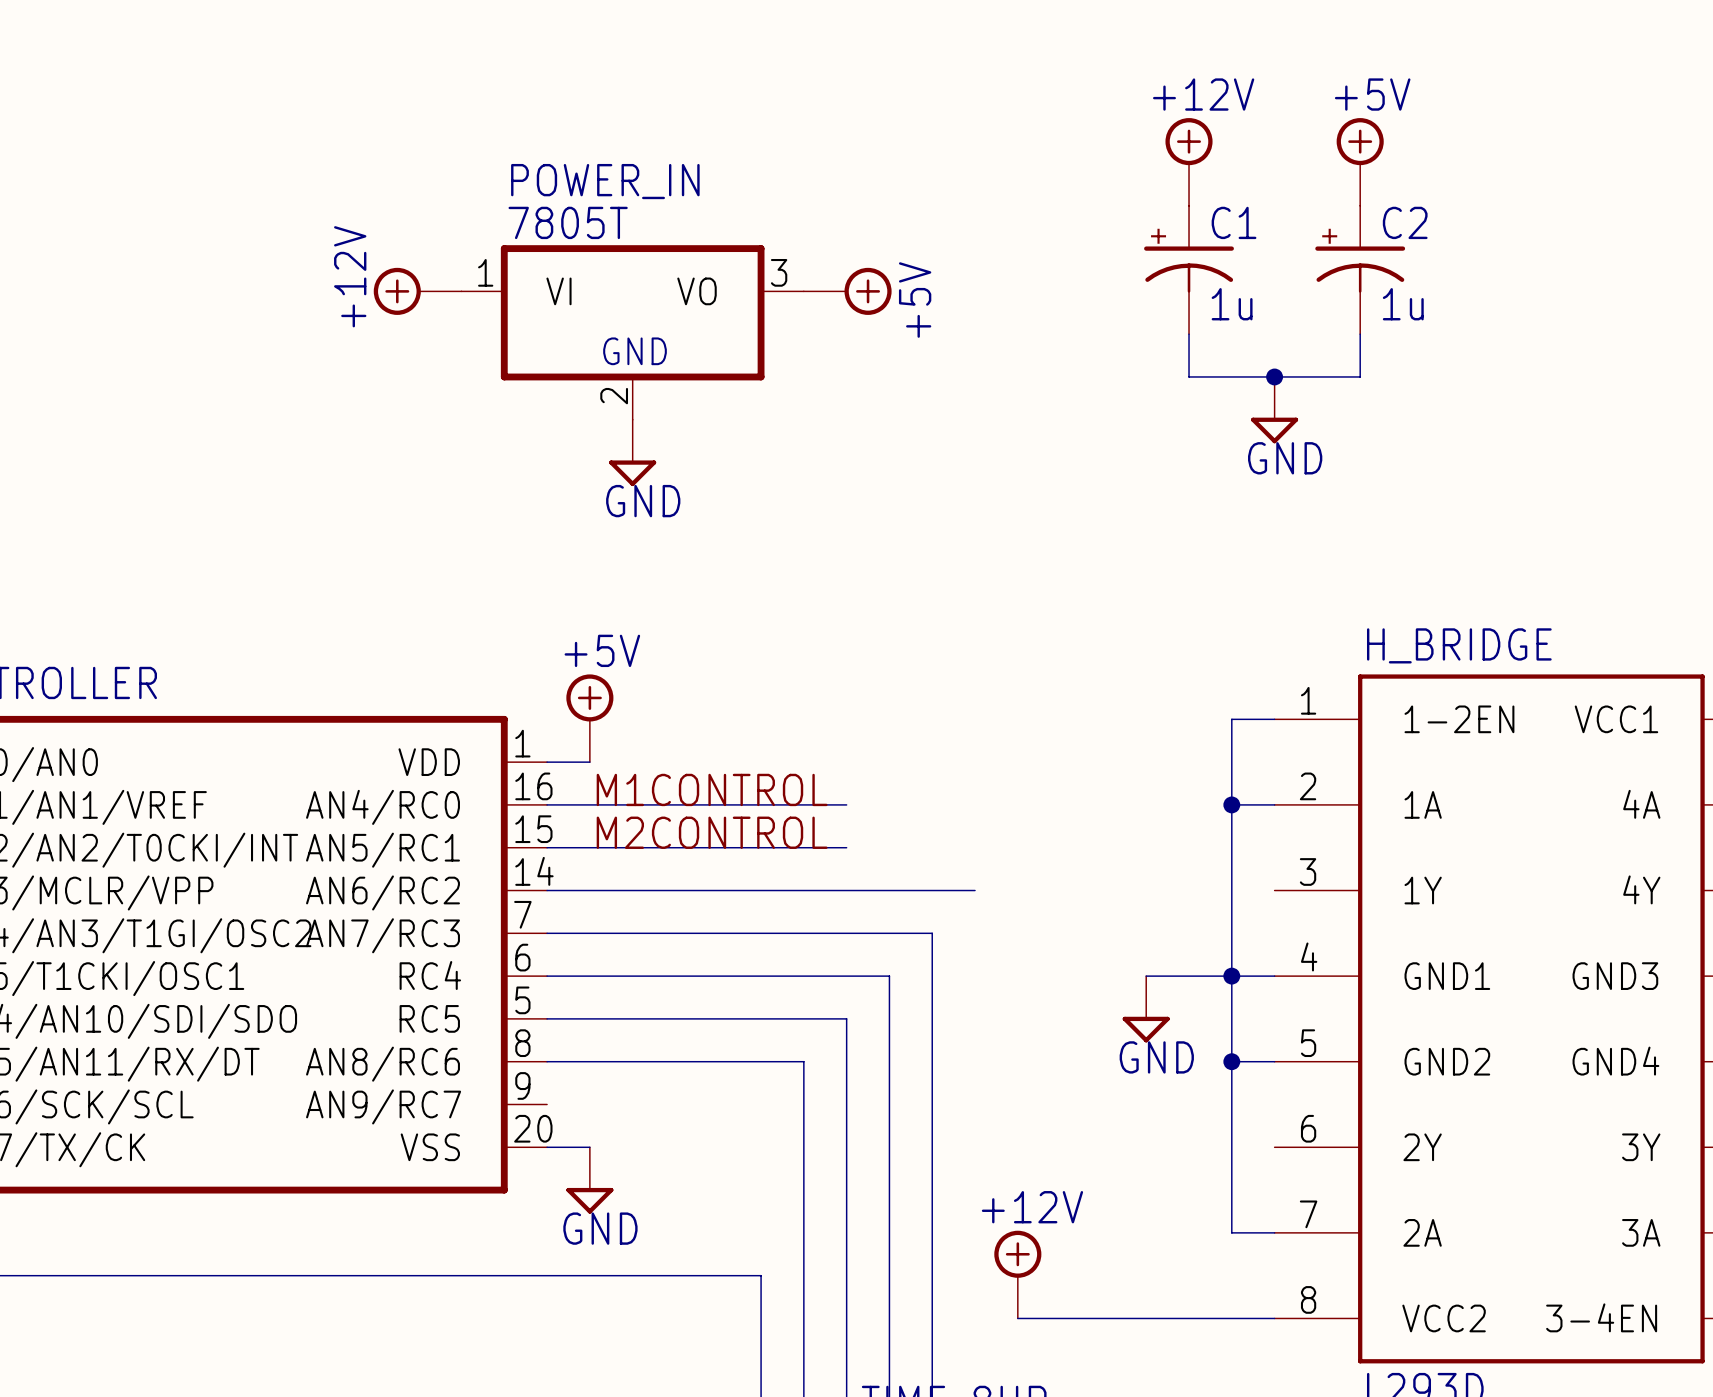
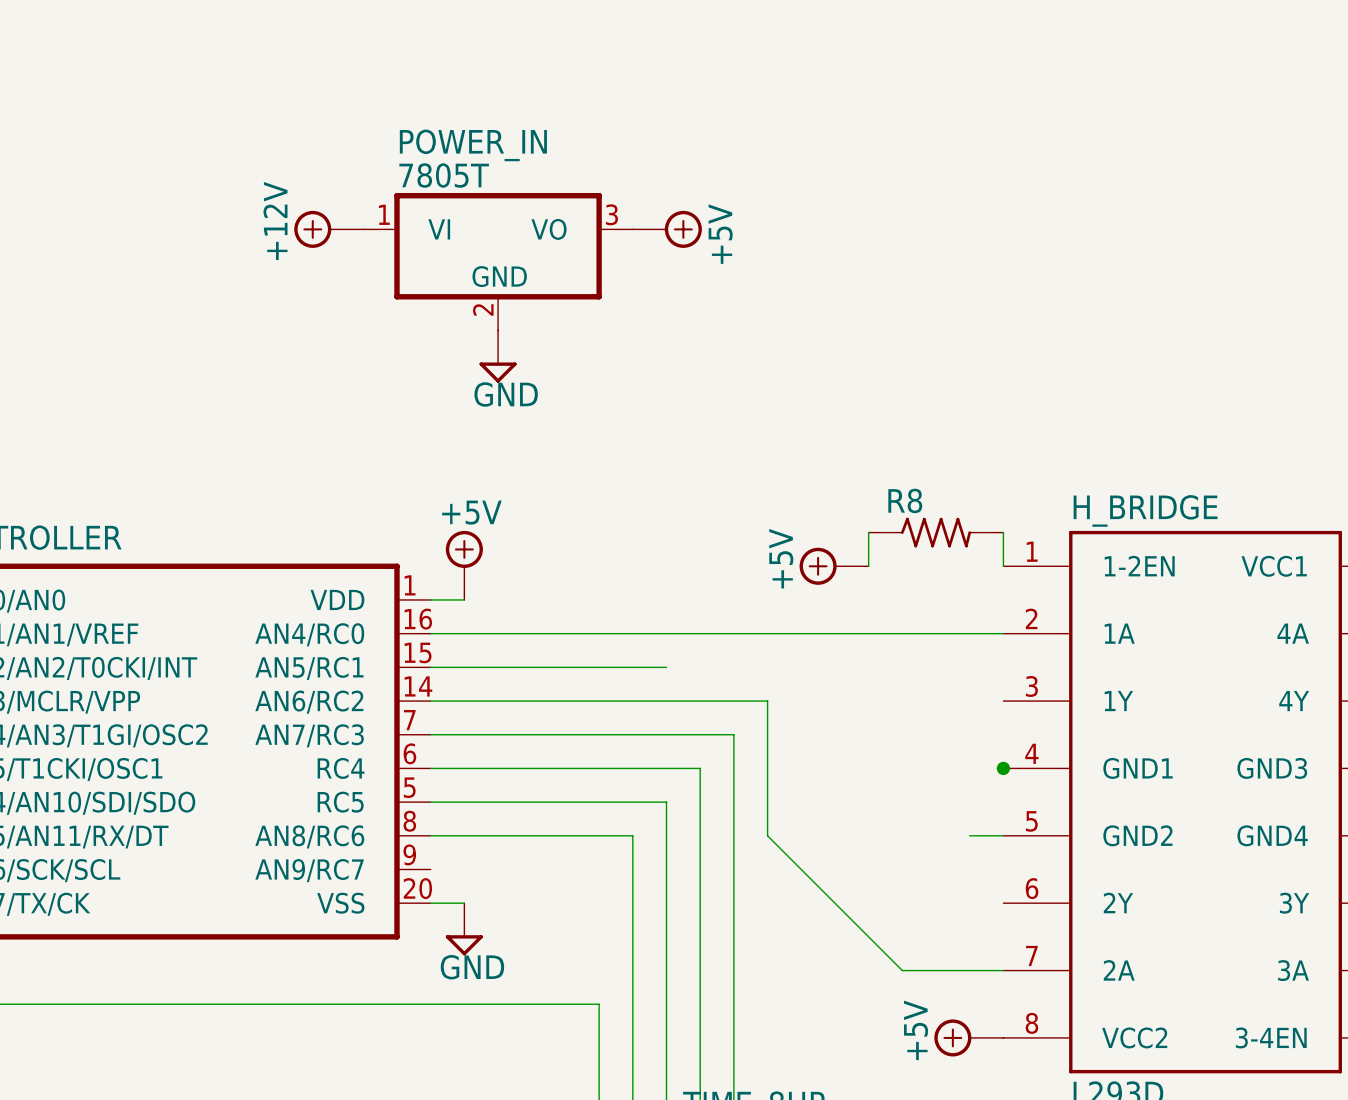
power symbol: +12V (1189, 161) -> none
power symbol: +5V (1360, 161) -> none
C1: 1u (1189, 269) -> none
C2: 1u (1360, 269) -> none
wire: (1189, 334) (1189, 376) (1360, 376) (1360, 334) -> none
junction: (1274, 376) -> none
power symbol: GND (1274, 410) -> none
wire: none -> (868, 532) (868, 566)
R8: none -> (936, 532)
wire: none -> (1003, 532) (1003, 566)
power symbol: none -> +5V (834, 566)
wire: (1274, 719) (1231, 719) (1231, 1232) -> (767, 701) (767, 835) (902, 970) (969, 970)
label: M1CONTROL (712, 789) -> none
wire: none -> (666, 633) (969, 633)
junction: (1231, 804) -> none
label: M2CONTROL (712, 832) -> none
wire: (1146, 976) (1274, 976) -> none
junction position: (1231, 976) -> (1003, 768)
power symbol: GND (1146, 1009) -> none
junction: (1231, 1061) -> none
power symbol: +12V (1017, 1274) -> none
wire: (1017, 1318) (1274, 1318) -> none
power symbol: none -> +5V (968, 1037)

